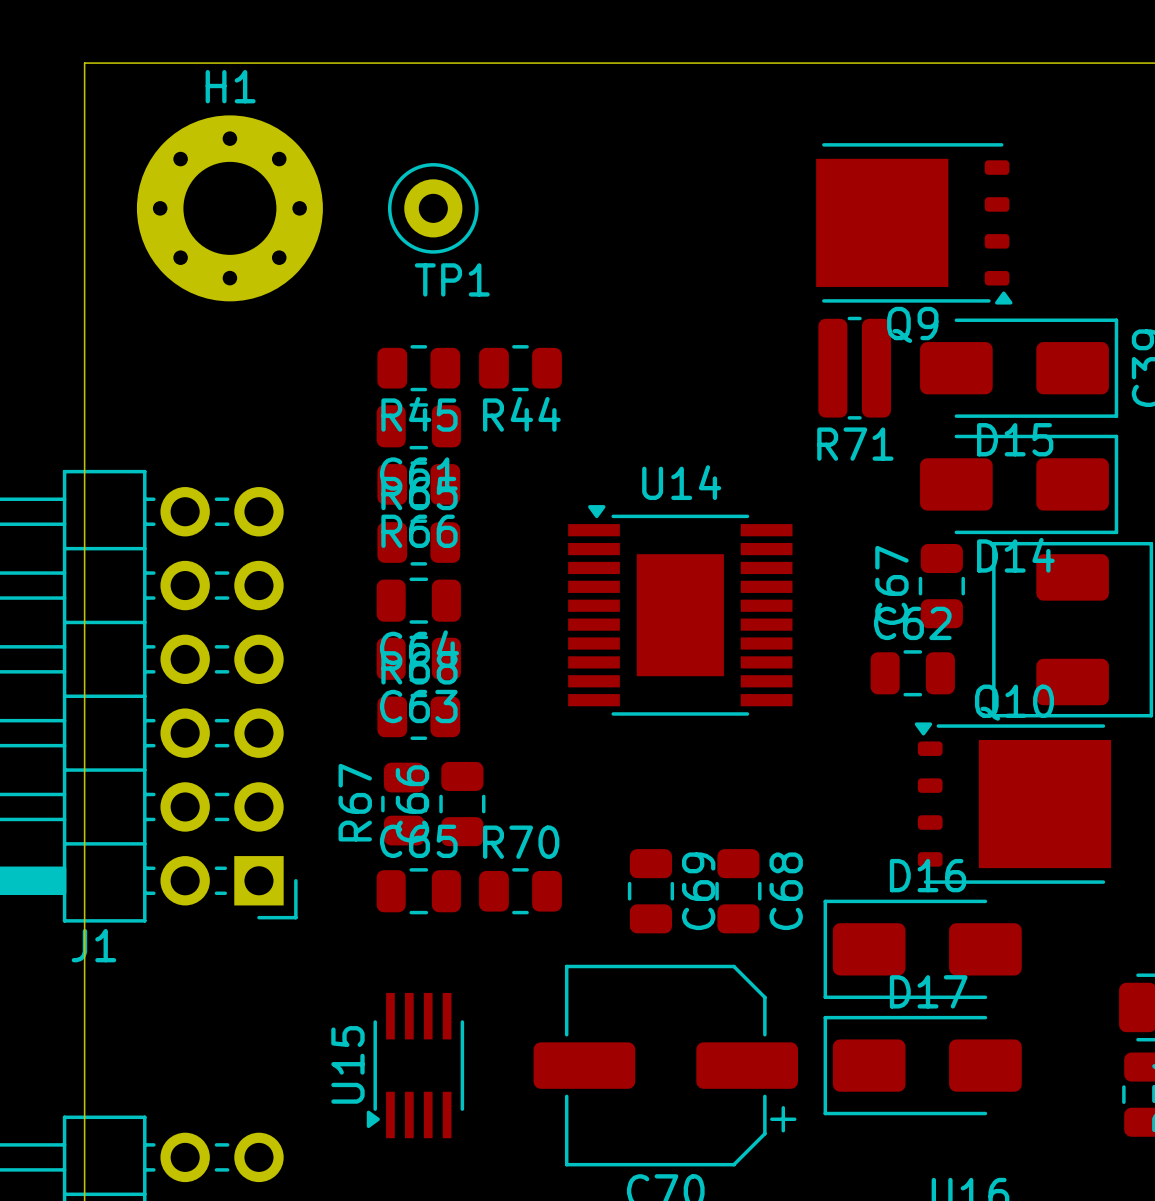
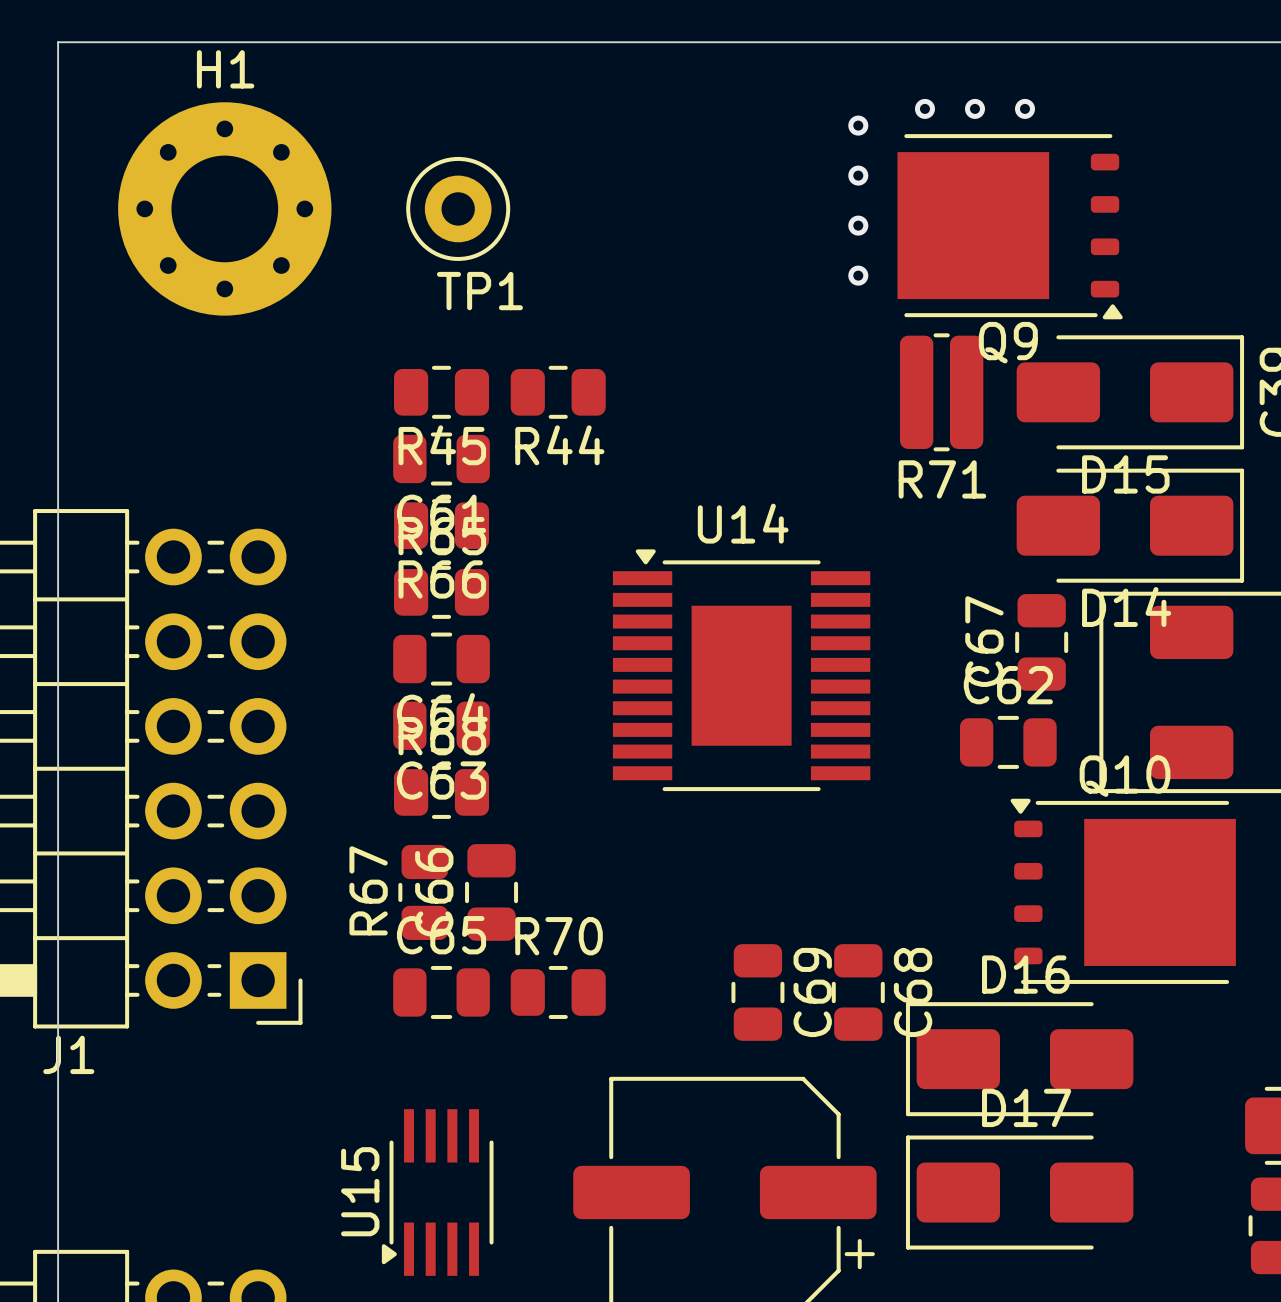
via: none -> (924, 108)
via: none -> (974, 108)
via: none -> (1025, 108)
via: none -> (858, 125)
via: none -> (858, 175)
via: none -> (858, 225)
via: none -> (858, 275)
C69 position: (650, 891) -> (757, 992)
C68 position: (738, 891) -> (858, 992)

